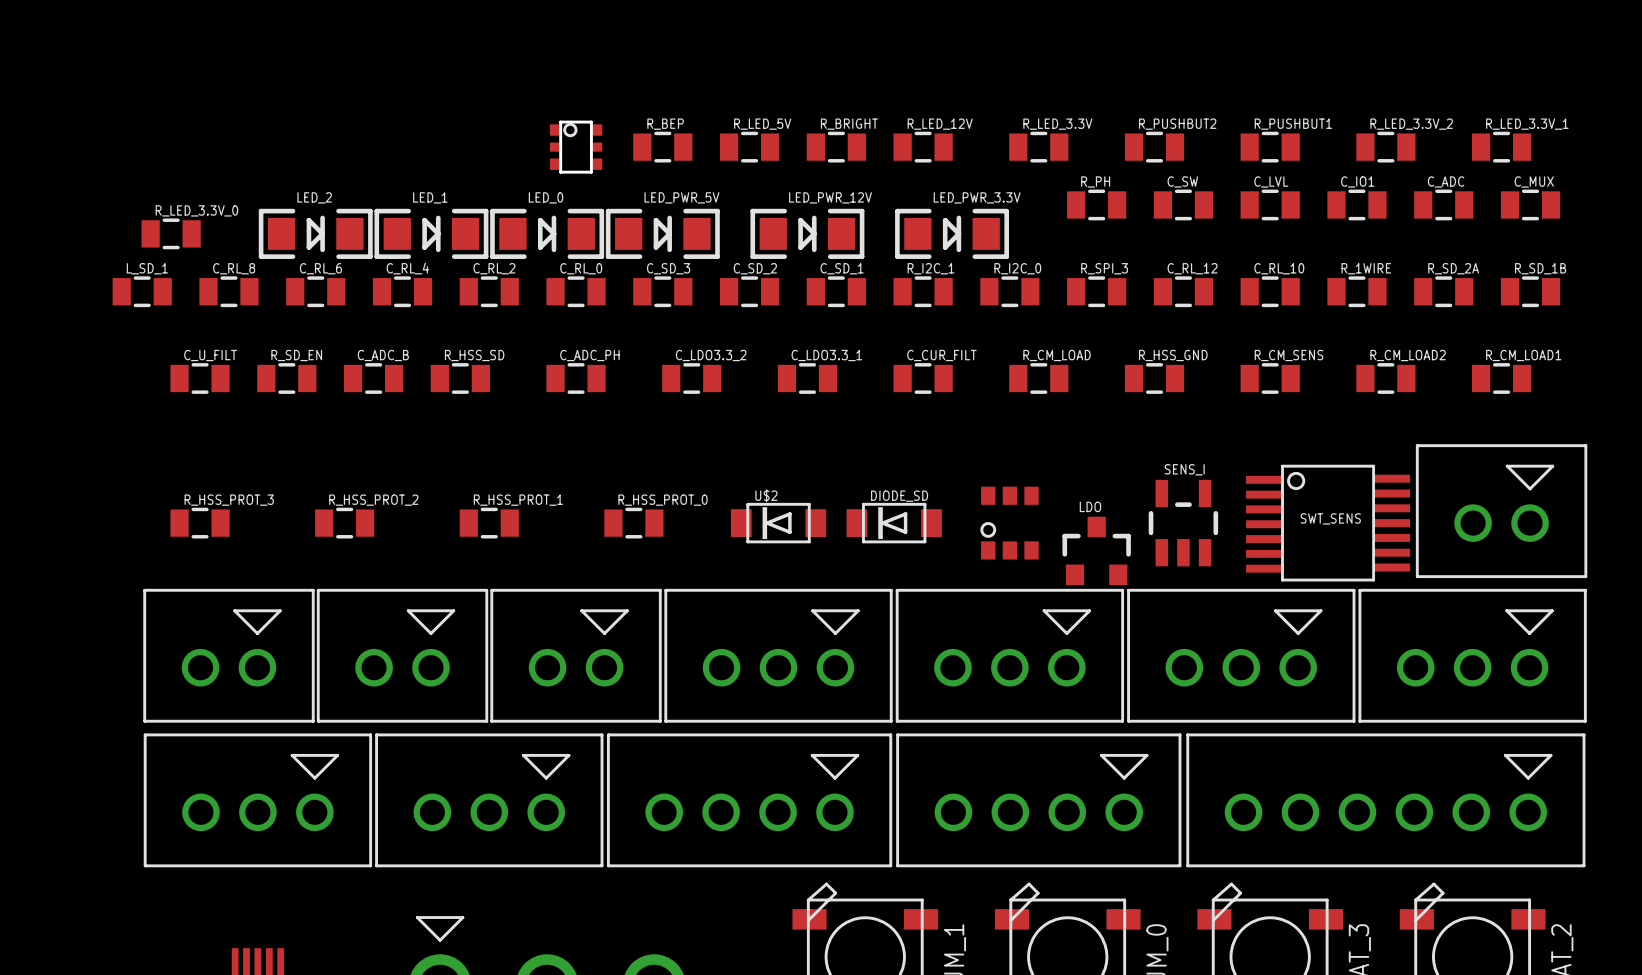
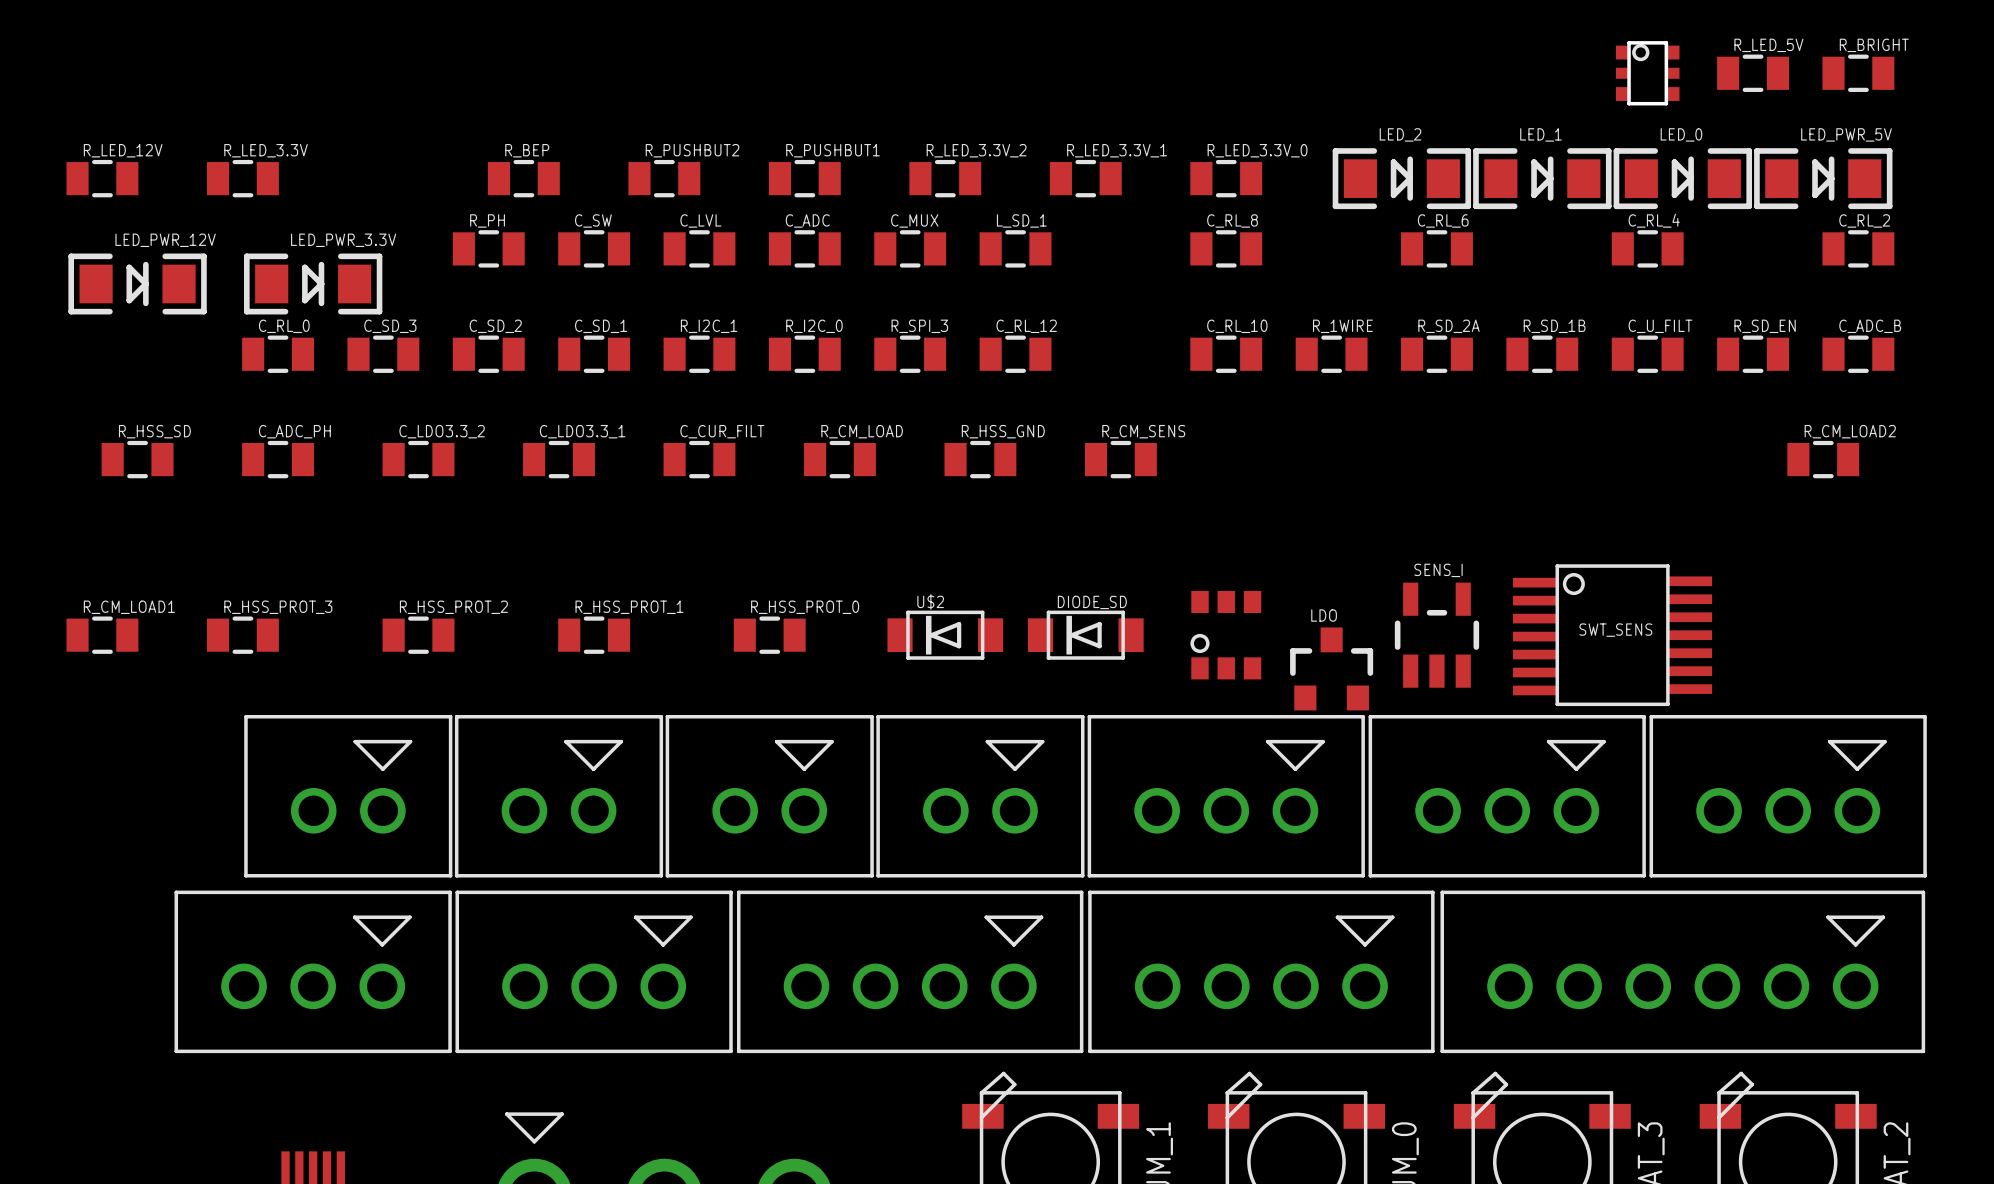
part: none -> (1647, 73)
R_BRIGHT: none -> (1858, 73)
R_BEP name: R_BEP (665, 124) -> R_PUSHBUT1 (833, 150)
R_BEP: none -> (523, 178)
part: (576, 147) -> none
R_LED_5V position: (749, 147) -> (1753, 73)
R_BRIGHT: (836, 147) -> none
R_LED_12V position: (923, 147) -> (102, 178)
R_LED_3.3V position: (1038, 147) -> (242, 178)
R_PUSHBUT2 position: (1154, 147) -> (664, 178)
R_PUSHBUT1: (1270, 147) -> none
R_LED_3.3V_2 position: (1385, 147) -> (945, 178)
R_LED_3.3V_1 position: (1501, 147) -> (1085, 178)
C_SW name: C_SW (1182, 181) -> C_RL_6 (1443, 220)
C_IO1 name: C_IO1 (1357, 181) -> C_RL_4 (1654, 220)
C_MUX name: C_MUX (1534, 181) -> C_RL_2 (1864, 220)
R_PH: none -> (488, 248)
C_SW: none -> (594, 248)
C_LVL: none -> (699, 248)
C_ADC: none -> (804, 248)
C_MUX: none -> (910, 248)
C_RL_8: none -> (1226, 248)
R_PH: (1096, 204) -> none
C_LVL: (1270, 204) -> none
C_ADC: (1443, 204) -> none
R_LED_3.3V_0 position: (171, 233) -> (1226, 178)
LED_2 position: (315, 233) -> (1401, 178)
LED_1 position: (431, 233) -> (1542, 178)
LED_0 position: (547, 233) -> (1682, 178)
LED_PWR_5V position: (662, 233) -> (1823, 178)
LED_PWR_12V position: (807, 233) -> (137, 283)
LED_PWR_3.3V position: (952, 233) -> (313, 283)
C_RL_8 name: C_RL_8 (234, 268) -> C_RL_0 (284, 326)
C_RL_6 name: C_RL_6 (320, 268) -> C_SD_3 (390, 326)
C_RL_4 name: C_RL_4 (407, 268) -> C_SD_2 (495, 326)
C_RL_2 name: C_RL_2 (494, 268) -> C_SD_1 (601, 326)
C_RL_0 name: C_RL_0 (581, 268) -> R_I2C_1 (709, 326)
C_SD_3 name: C_SD_3 (668, 268) -> R_I2C_0 (814, 326)
C_SD_2 name: C_SD_2 (755, 268) -> R_SPI_3 (919, 326)
C_SD_1 name: C_SD_1 (842, 268) -> C_RL_12 (1026, 326)
R_I2C_0 name: R_I2C_0 (1017, 268) -> C_RL_10 (1237, 326)
R_SPI_3 name: R_SPI_3 (1104, 268) -> R_1WIRE (1342, 326)
C_RL_12 name: C_RL_12 (1192, 268) -> R_SD_2A (1449, 326)
C_RL_10 name: C_RL_10 (1279, 268) -> R_SD_1B (1554, 326)
R_1WIRE name: R_1WIRE (1366, 268) -> C_U_FILT (1660, 326)
R_SD_2A name: R_SD_2A (1453, 268) -> R_SD_EN (1765, 326)
R_SD_1B name: R_SD_1B (1540, 268) -> C_ADC_B (1870, 326)
L_SD_1 position: (142, 291) -> (1015, 248)
R_I2C_1: (923, 291) -> none
R_HSS_SD name: R_HSS_SD (474, 355) -> C_LDO3.3_1 (582, 431)
C_ADC_PH name: C_ADC_PH (589, 355) -> C_CUR_FILT (722, 431)
C_LDO3.3_2 name: C_LDO3.3_2 (711, 355) -> R_CM_LOAD (862, 431)
C_LDO3.3_1 name: C_LDO3.3_1 (826, 355) -> R_HSS_GND (1003, 431)
C_CUR_FILT name: C_CUR_FILT (941, 355) -> R_CM_SENS (1143, 431)
R_CM_LOAD1 name: R_CM_LOAD1 (1523, 355) -> R_CM_LOAD2 (1850, 431)
R_HSS_SD: none -> (137, 459)
C_U_FILT: (200, 378) -> none
C_ADC_PH: none -> (278, 459)
R_SD_EN: (286, 378) -> none
C_LDO3.3_2: none -> (418, 459)
C_ADC_B: (373, 378) -> none
R_CM_LOAD: (1038, 378) -> none
R_HSS_GND: (1154, 378) -> none
R_CM_SENS: (1270, 378) -> none
R_CM_LOAD2: (1385, 378) -> none
part: (1501, 511) -> none
R_CM_LOAD1: none -> (102, 635)
part: (228, 655) -> none
part: none -> (348, 796)
part: (402, 655) -> none
part: none -> (559, 796)
part: (576, 655) -> none
part: none -> (769, 796)
part: (778, 655) -> none
part: none -> (980, 796)

